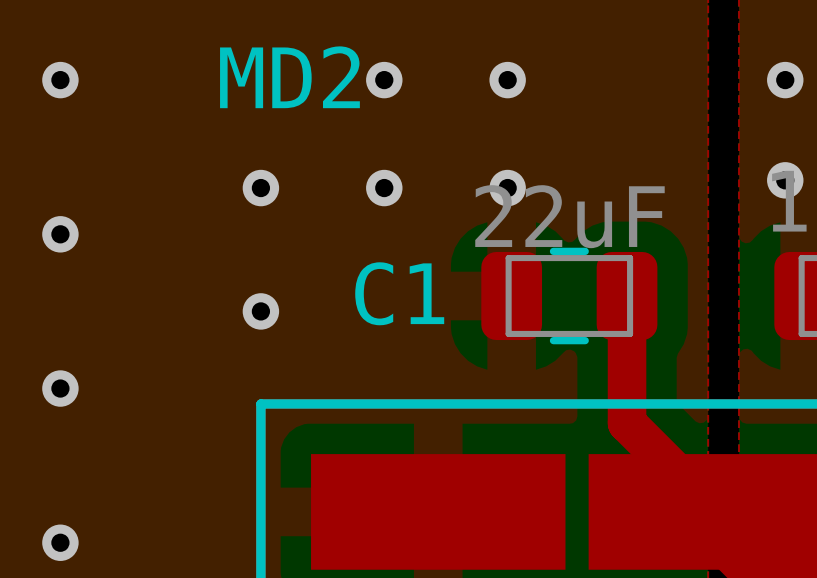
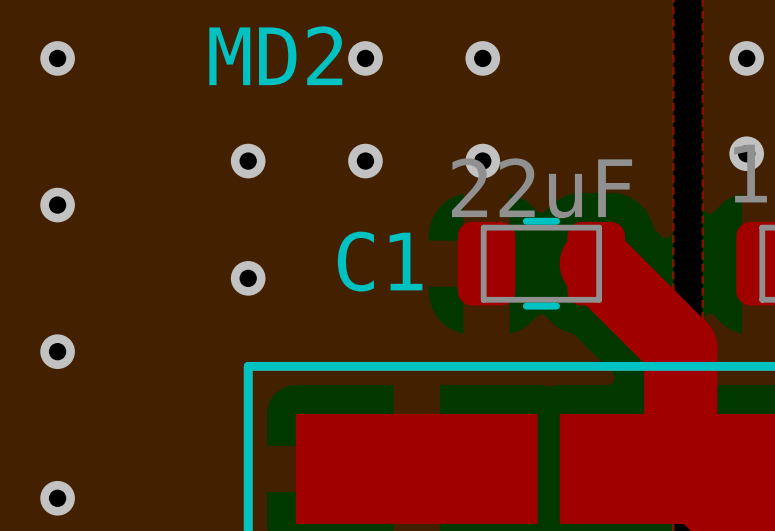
top track: (627, 296) (627, 423) (715, 511) -> (596, 263) (680, 348) (680, 468)

